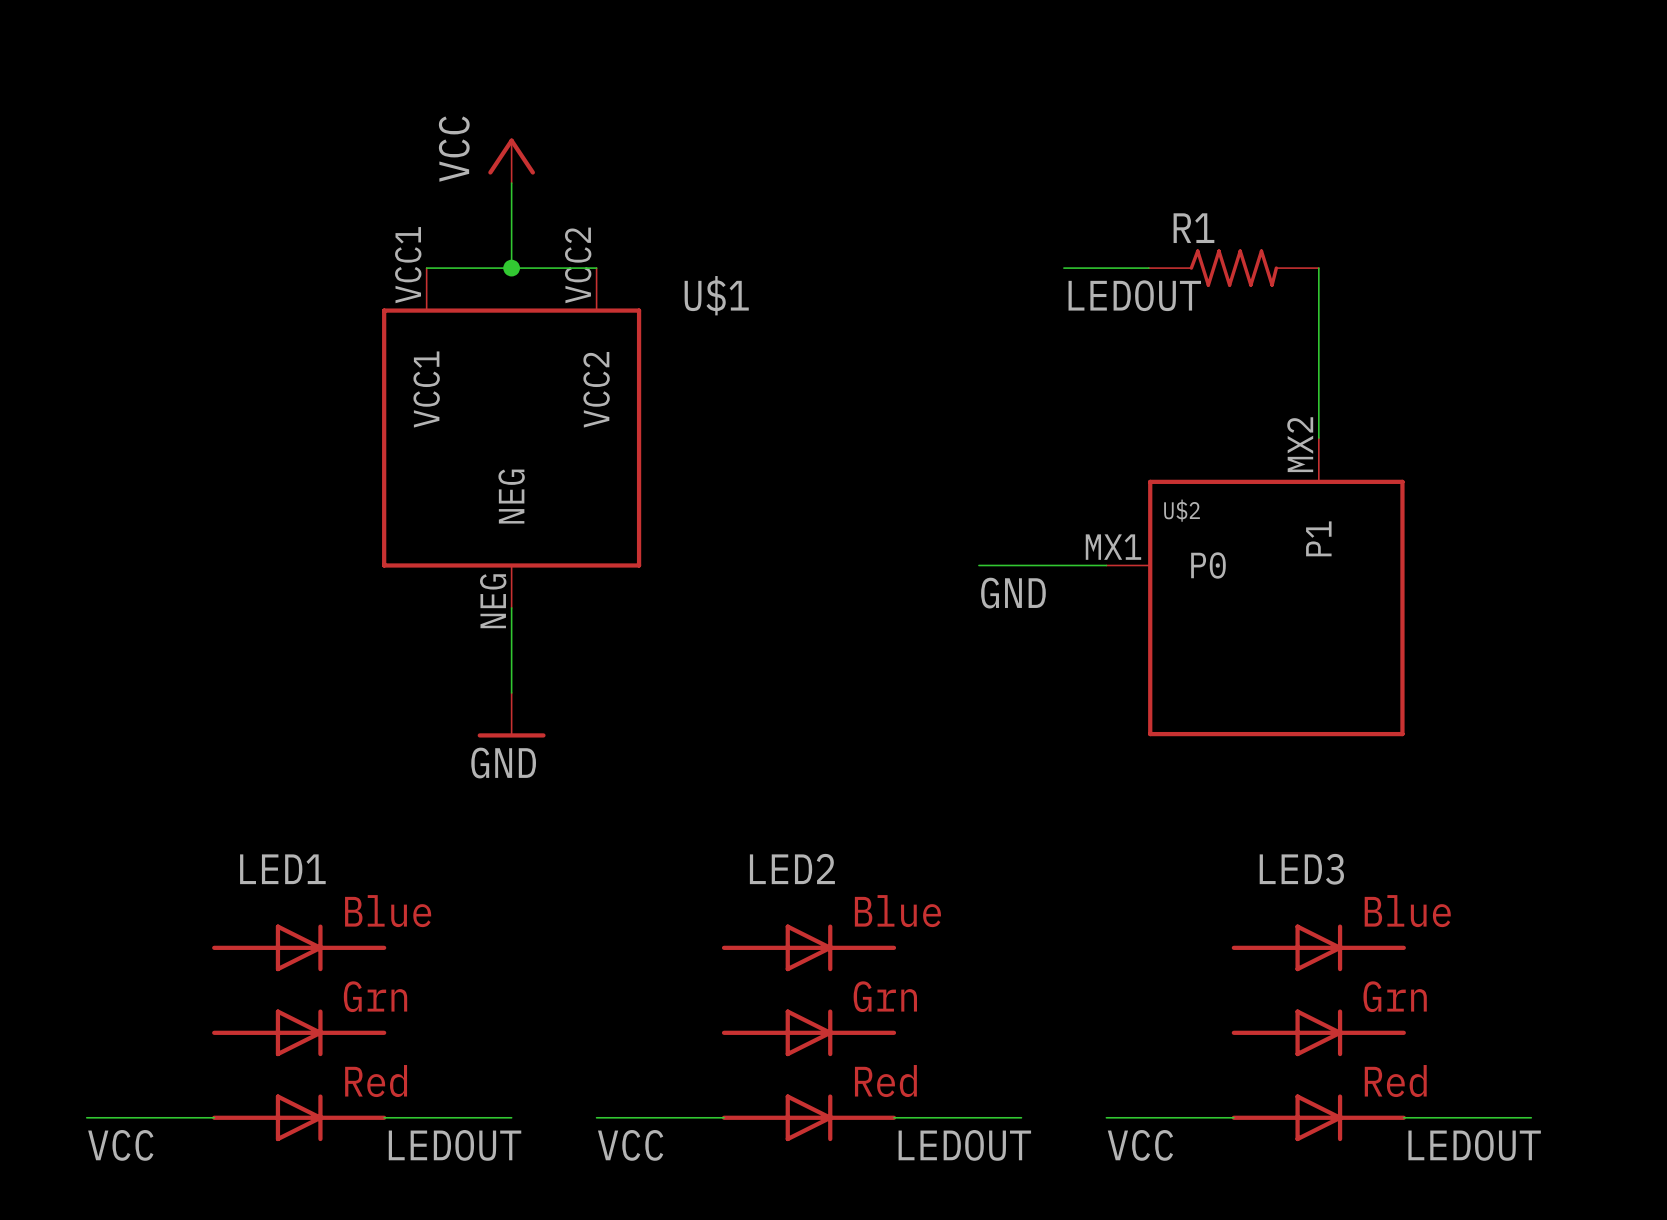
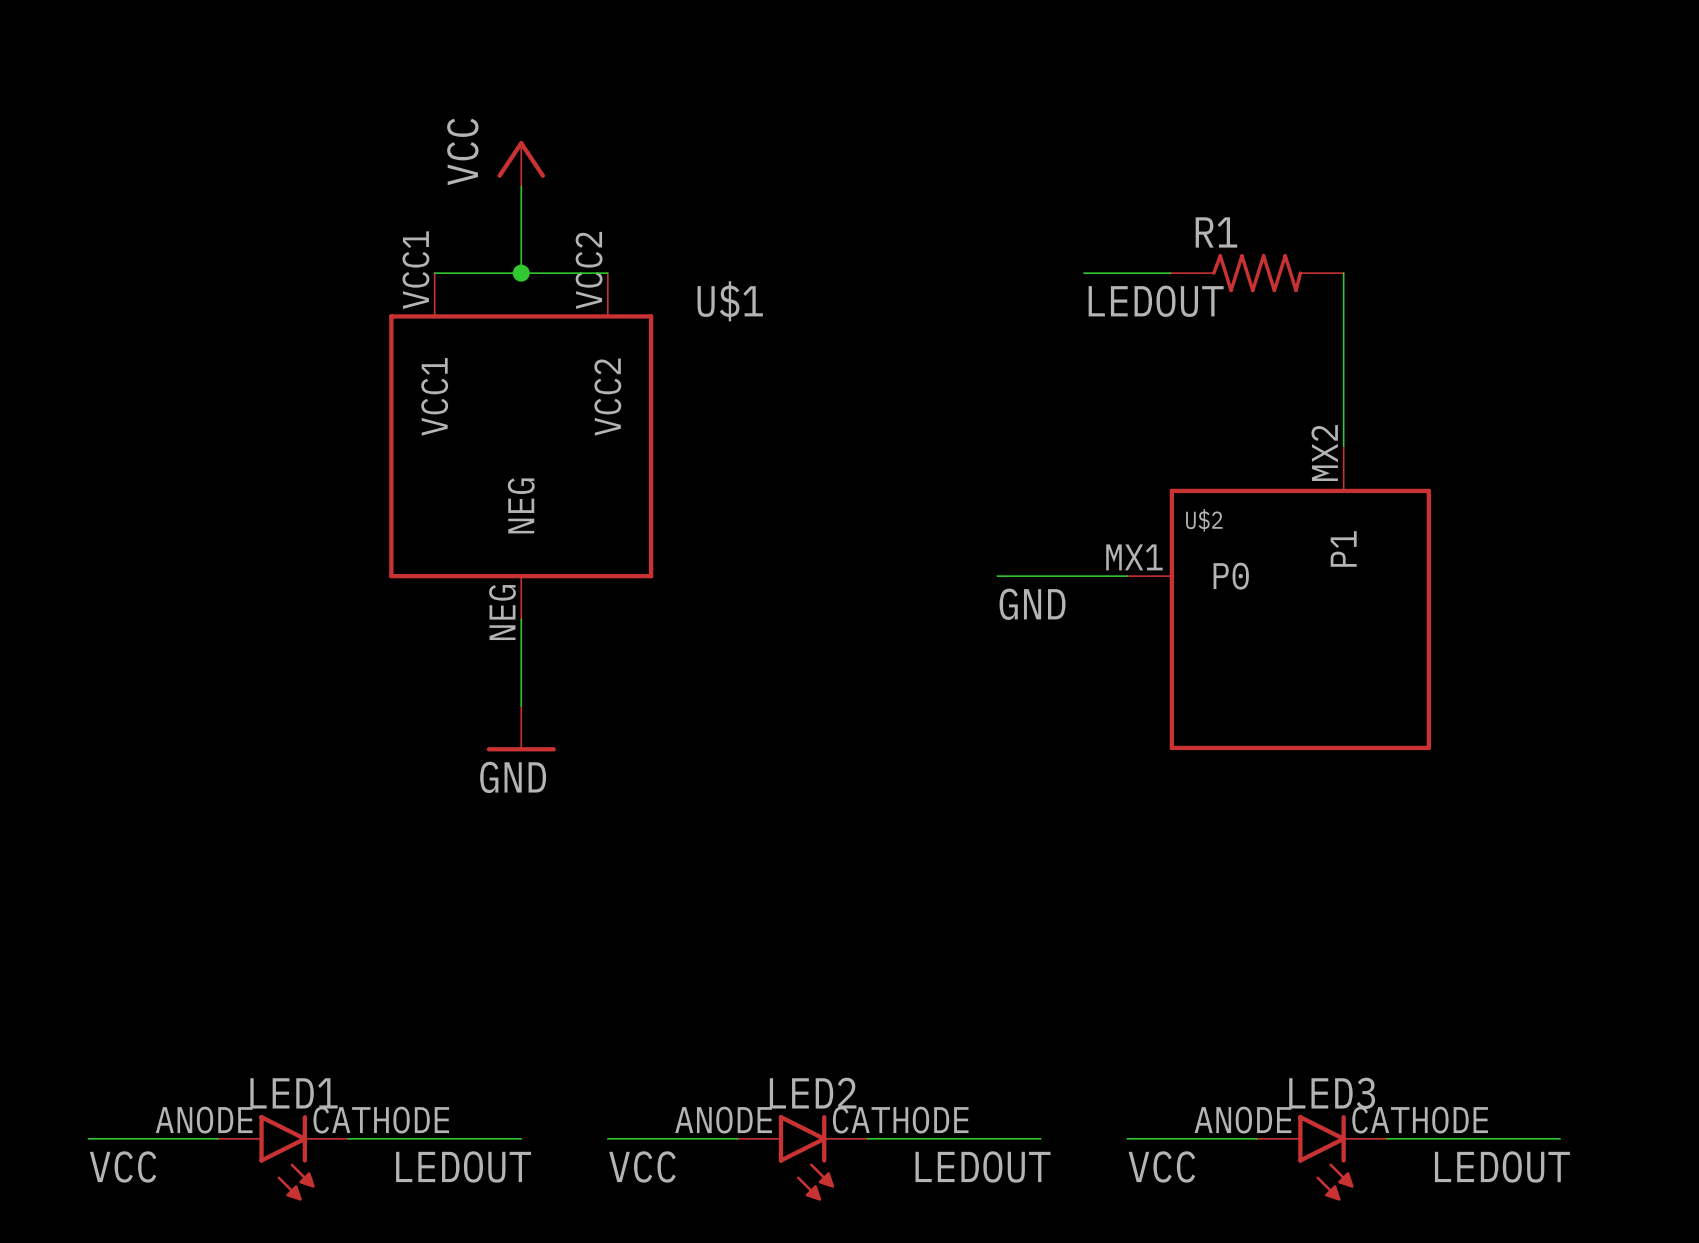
LED1 name position: LED1 (282, 869) -> LED1 (293, 1093)
LED2 name position: LED2 (792, 869) -> LED2 (813, 1093)
LED3 name position: LED3 (1301, 869) -> LED3 (1332, 1093)
LED1 symbol: [212, 924, 387, 1142] -> [218, 1115, 349, 1201]
LED2 symbol: [721, 924, 897, 1142] -> [737, 1115, 868, 1201]
LED3 symbol: [1231, 924, 1406, 1142] -> [1257, 1115, 1387, 1201]

